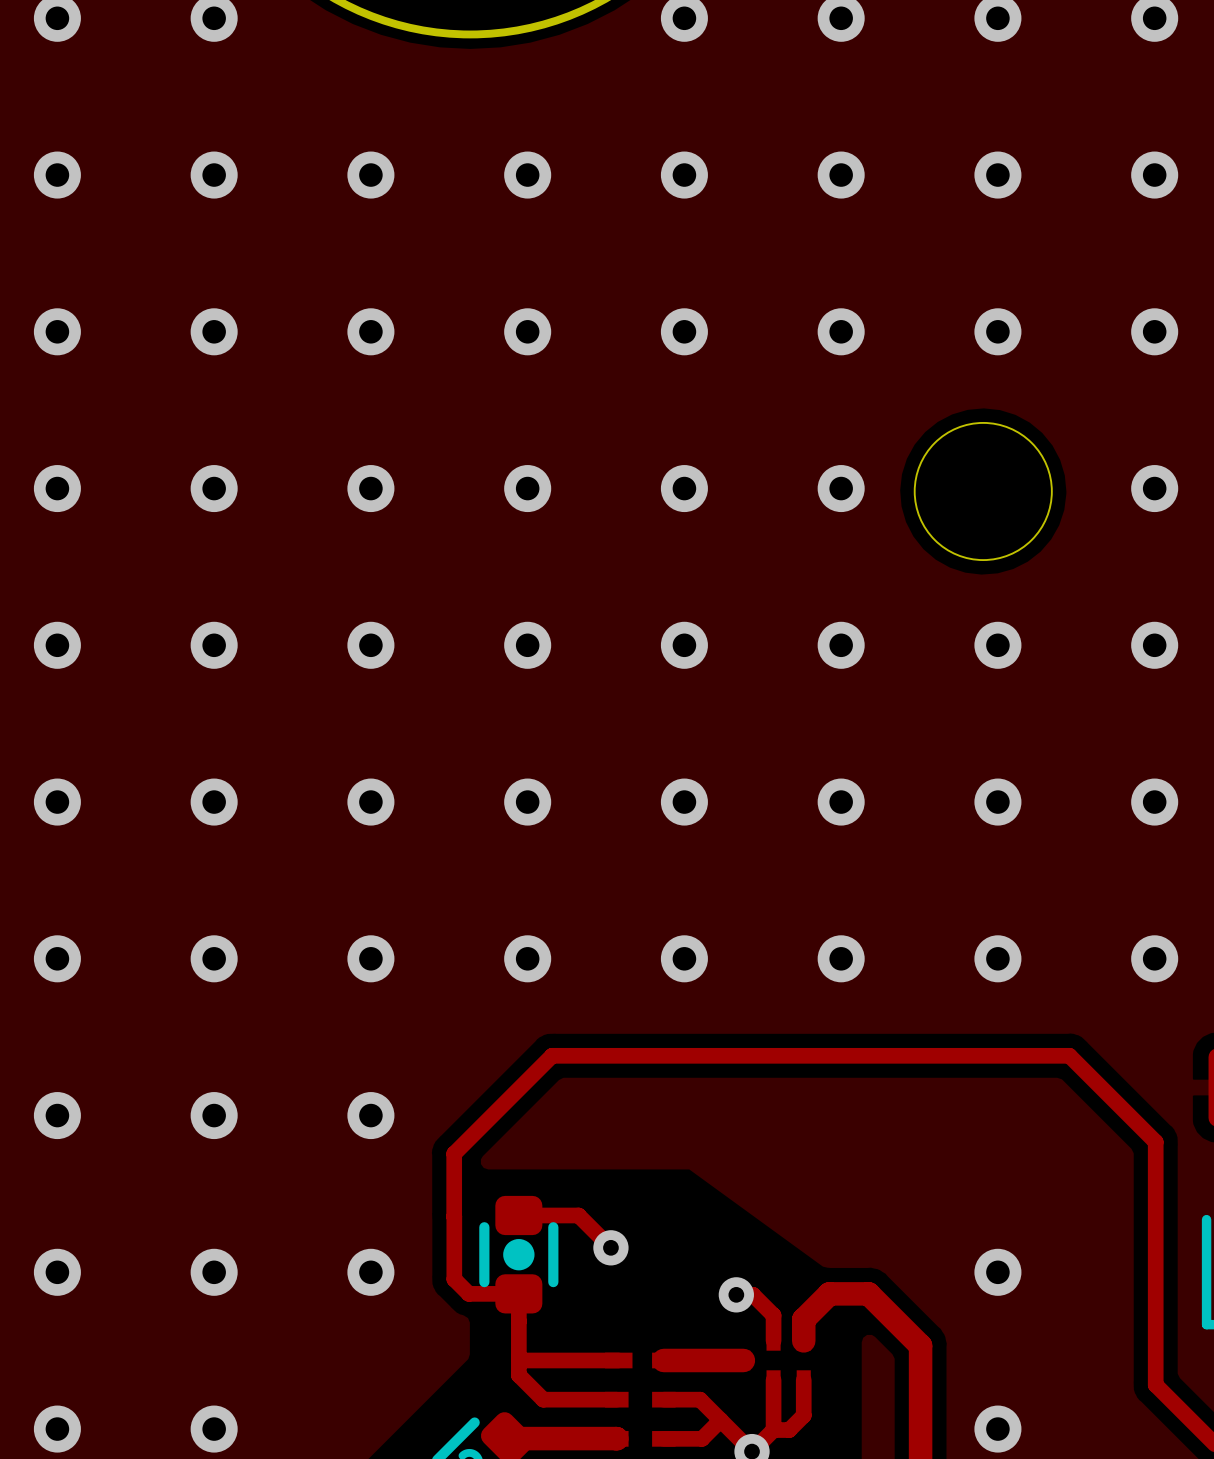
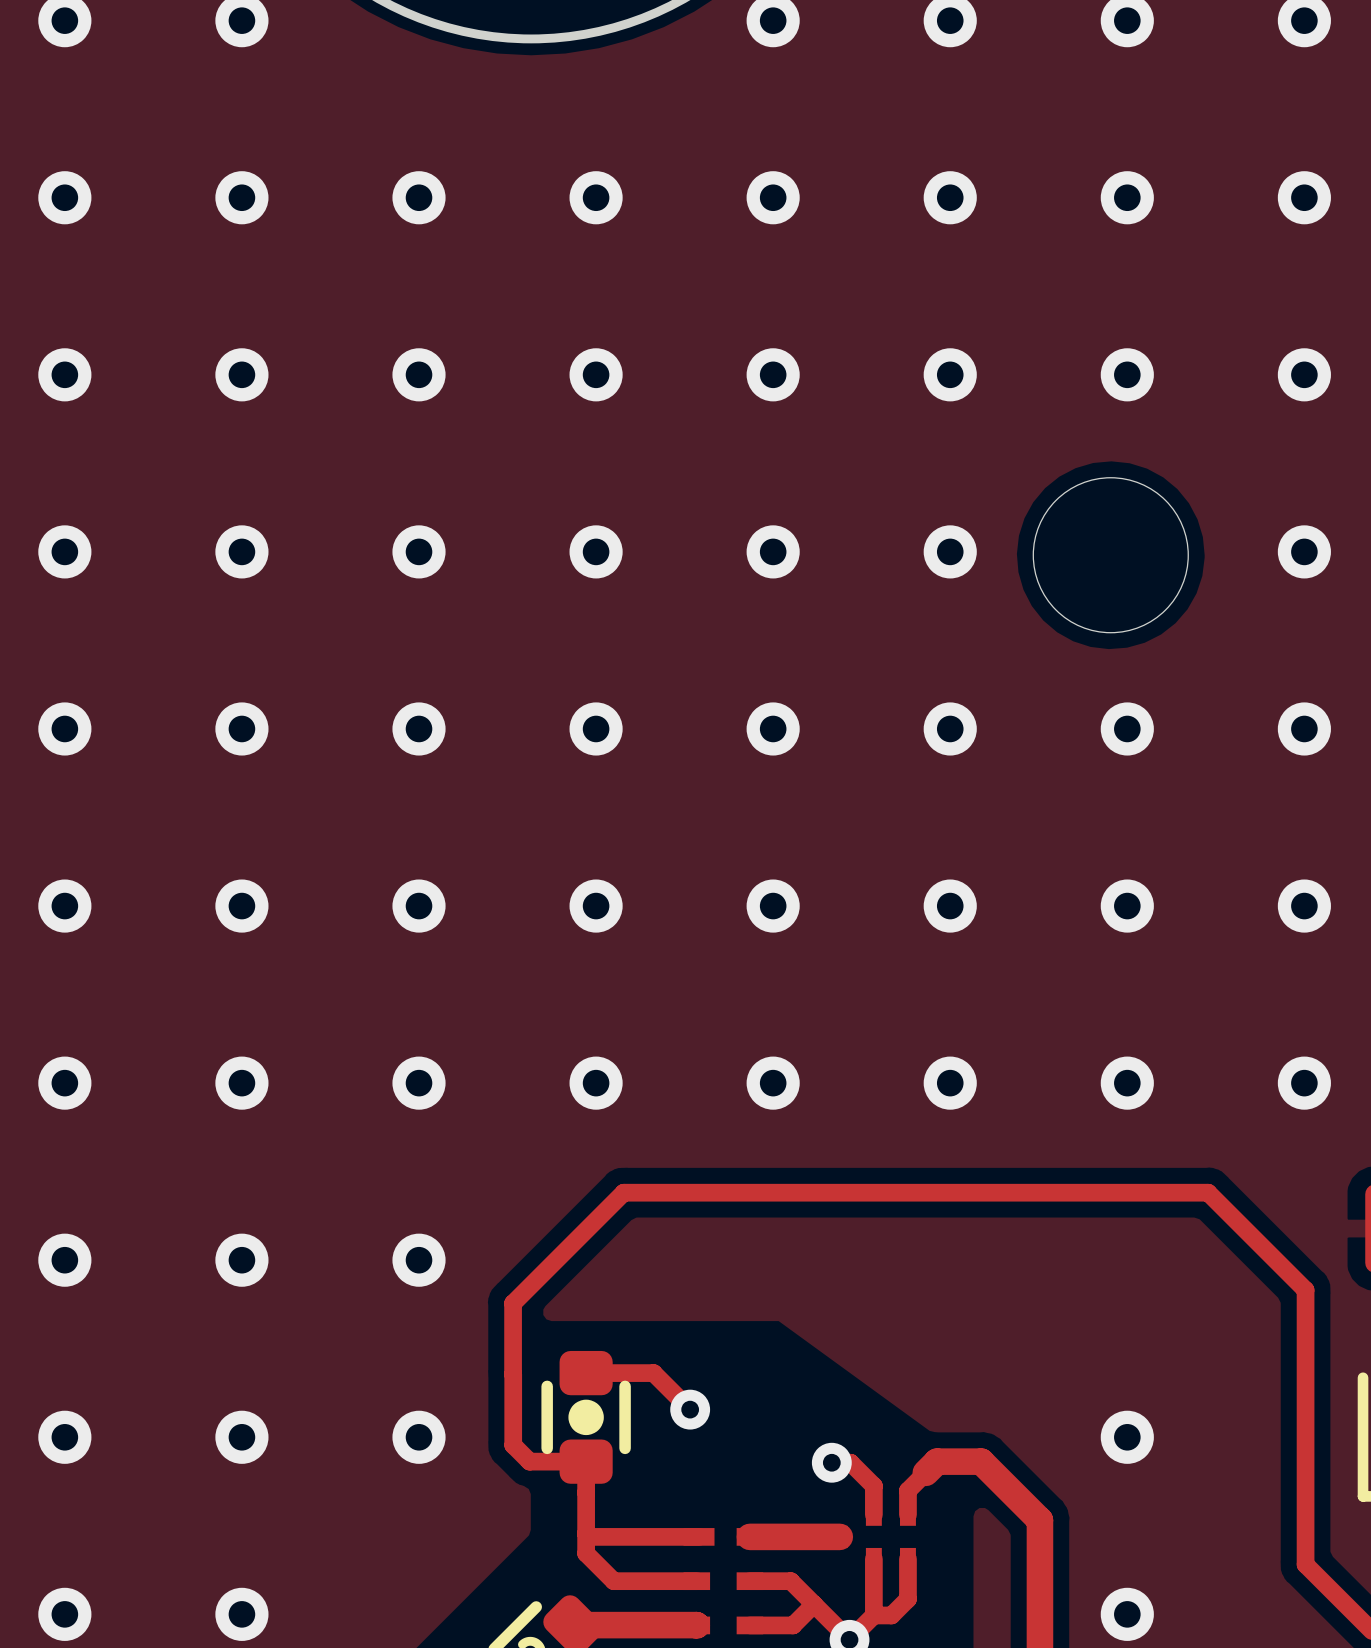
track width: thick (819, 1303) (803, 1319) (803, 1340) -> thin (925, 1472) (907, 1490) (907, 1514)

